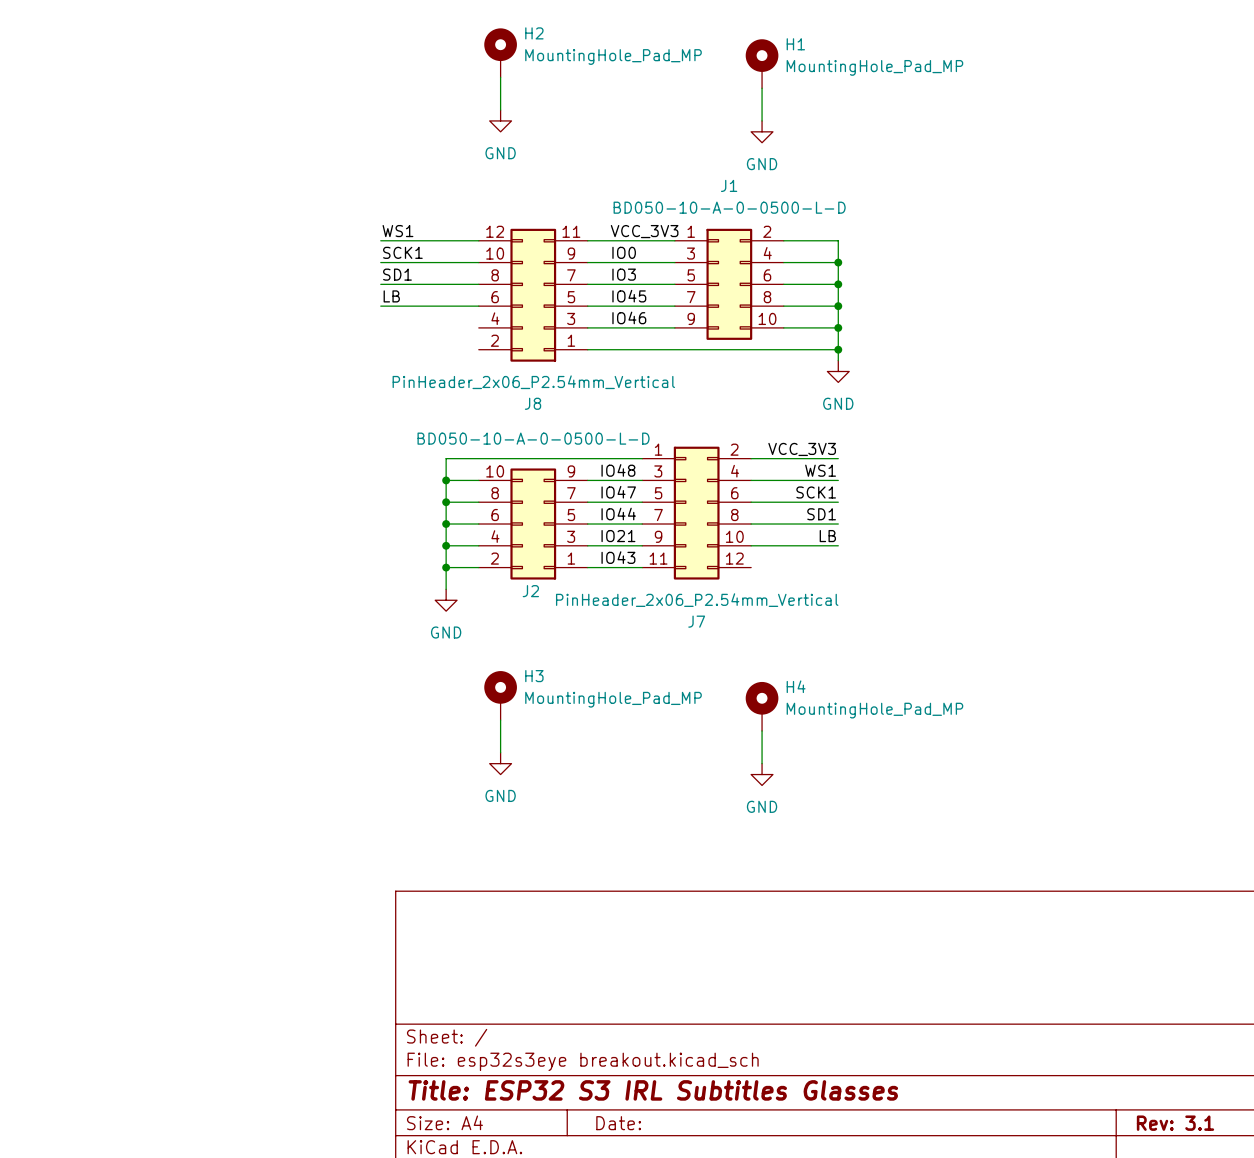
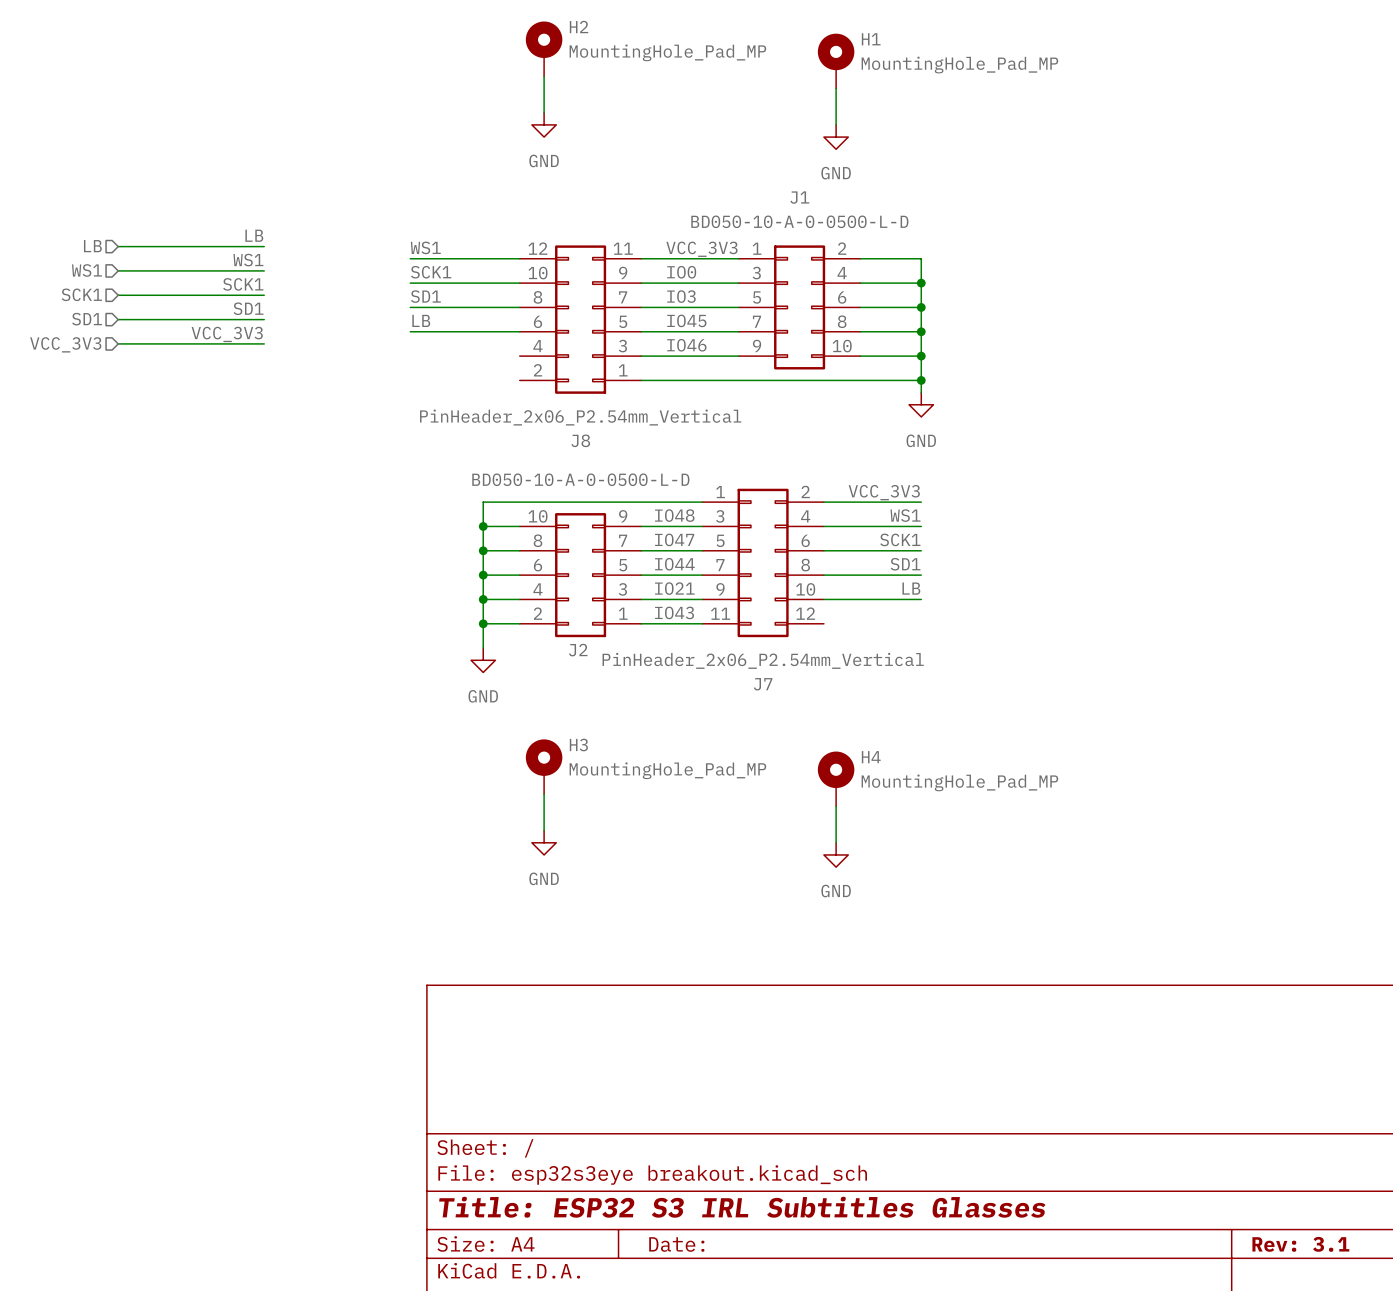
label: none -> LB (254, 235)
hierarchical label: none -> LB (92, 246)
wire: none -> (118, 246) (264, 246)
label: none -> WS1 (248, 260)
hierarchical label: none -> WS1 (86, 270)
wire: none -> (118, 270) (264, 270)
label: none -> SCK1 (243, 284)
hierarchical label: none -> SCK1 (81, 294)
wire: none -> (118, 295) (264, 295)
label: none -> SD1 (248, 308)
hierarchical label: none -> SD1 (87, 319)
wire: none -> (118, 319) (264, 319)
label: none -> VCC_3V3 (227, 334)
hierarchical label: none -> VCC_3V3 (65, 344)
wire: none -> (118, 343) (264, 343)

